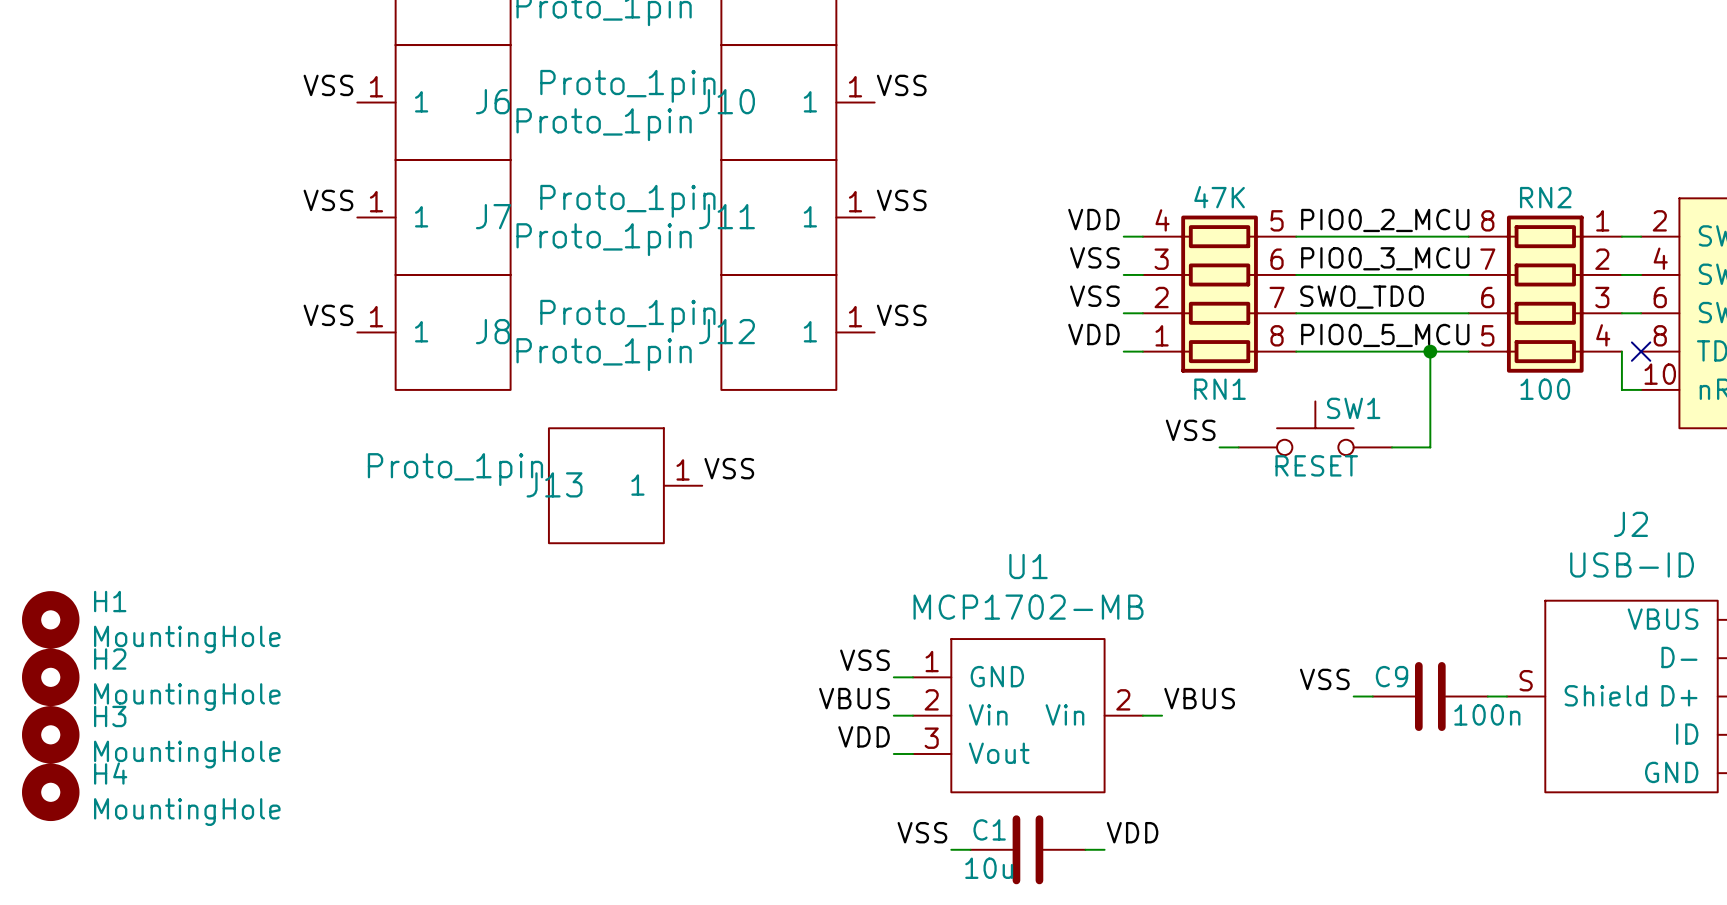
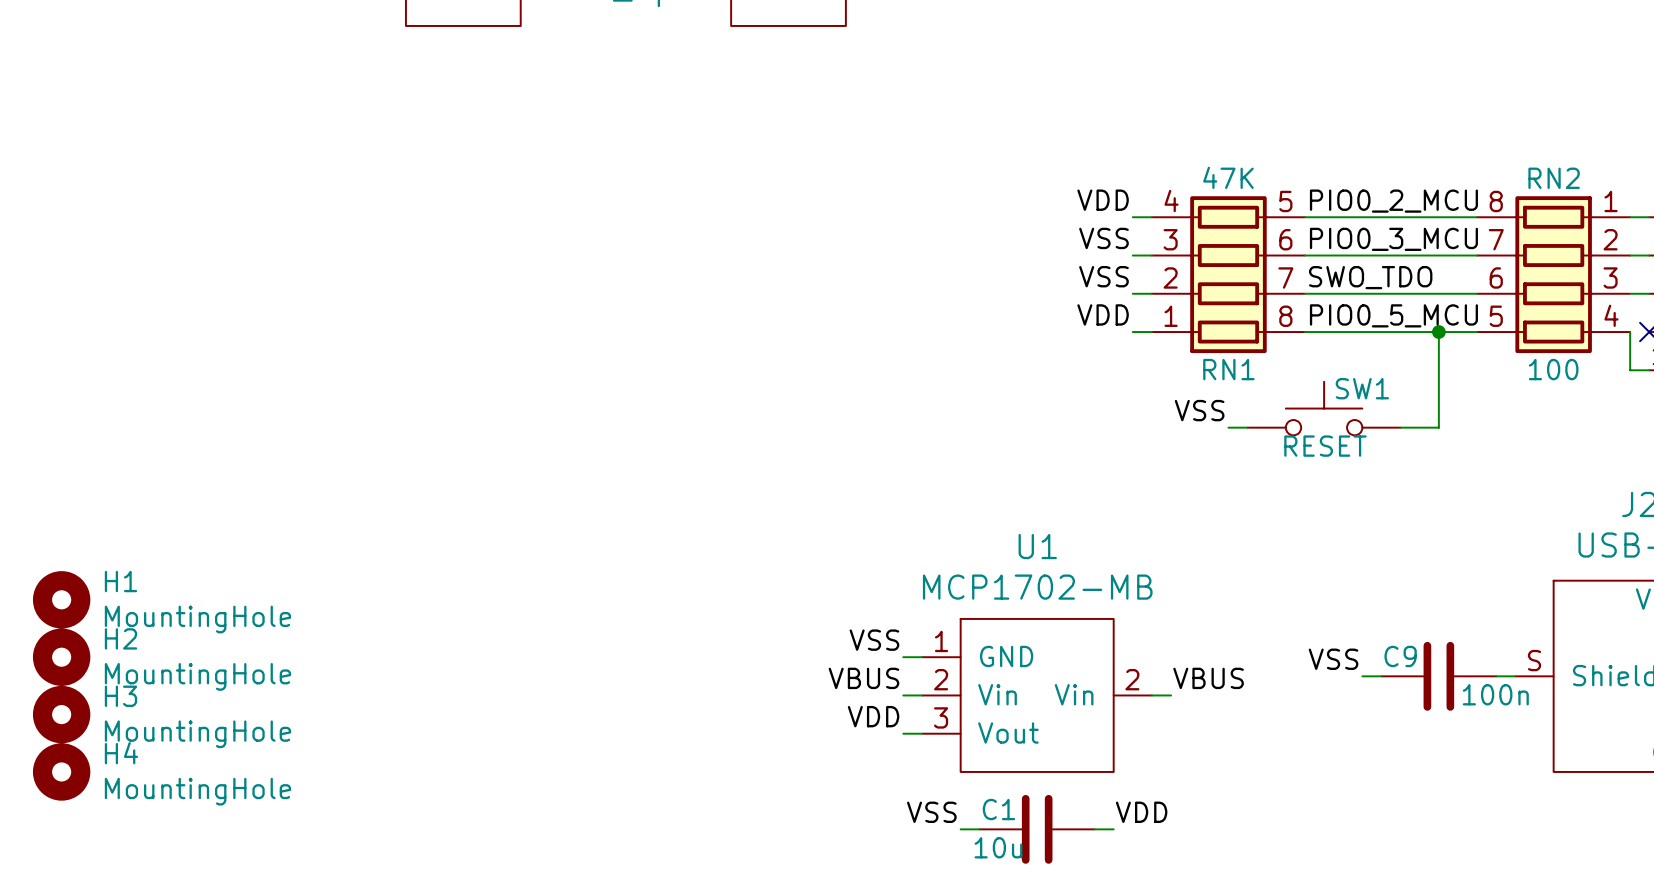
label: VSS (328, 85) -> none
label: VSS (901, 85) -> none
J6: Proto_1pin (433, 102) -> none
J10: Proto_1pin (798, 102) -> none
label: VSS (328, 200) -> none
label: VSS (901, 200) -> none
J7: Proto_1pin (433, 217) -> none
J11: Proto_1pin (798, 217) -> none
label: VSS (328, 315) -> none
label: VSS (901, 315) -> none
J8: Proto_1pin (433, 332) -> none
J12: Proto_1pin (798, 332) -> none
label: VSS (729, 468) -> none
J13: Proto_1pin (625, 485) -> none

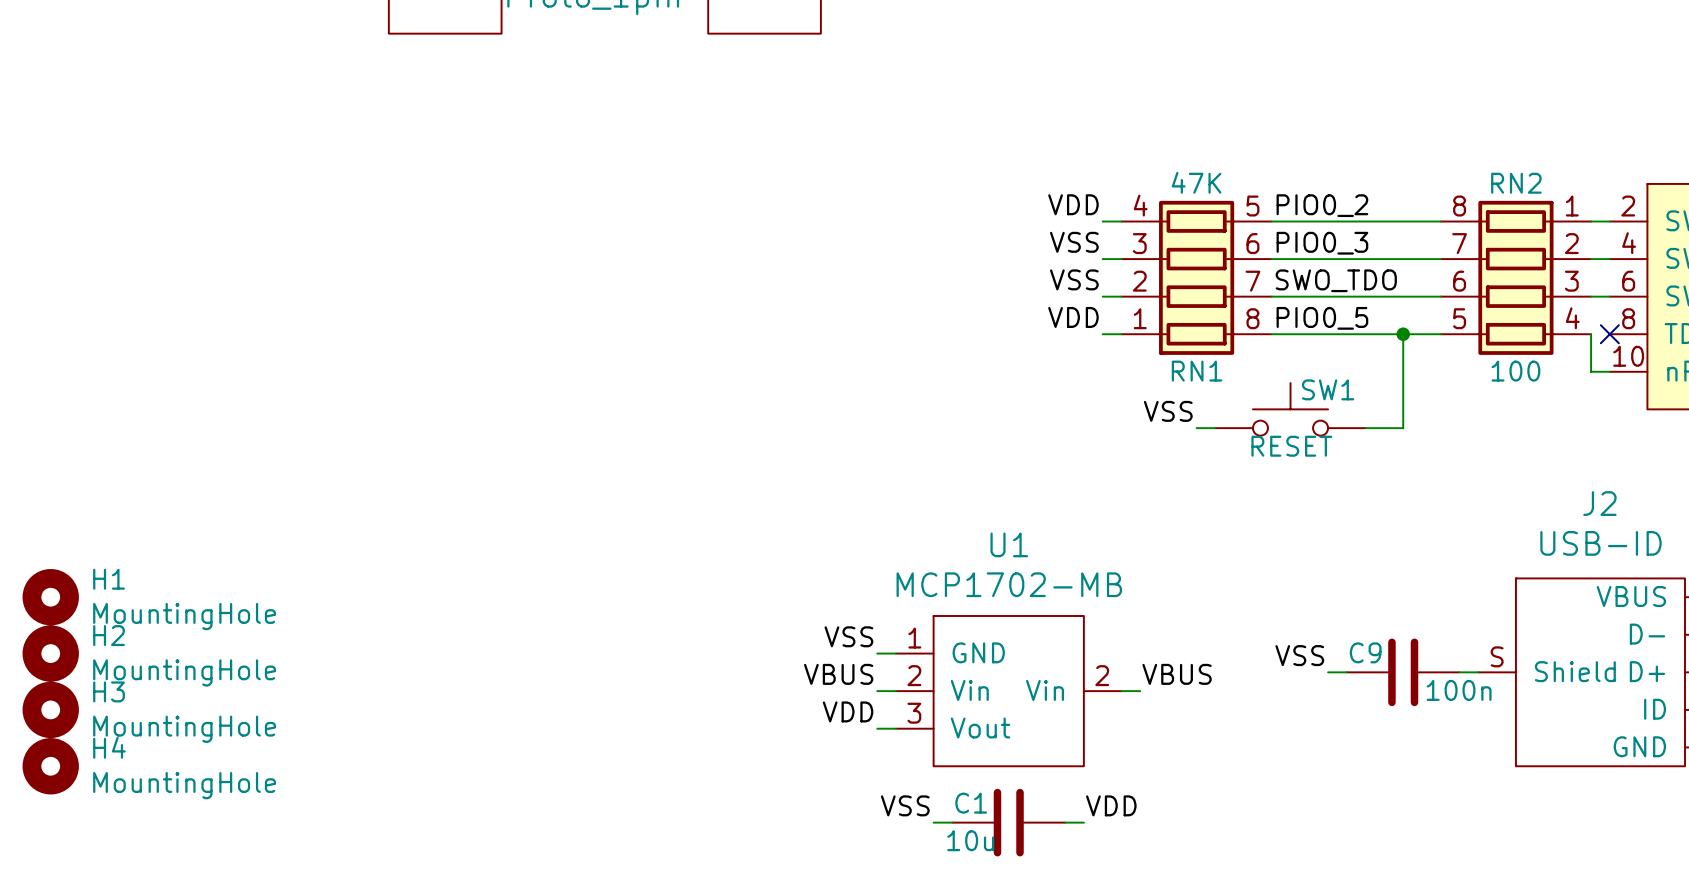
label: PIO0_2_MCU (1393, 201) -> PIO0_2 (1322, 205)
label: PIO0_3_MCU (1393, 239) -> PIO0_3 (1322, 243)
label: PIO0_5_MCU (1393, 315) -> PIO0_5 (1322, 318)

